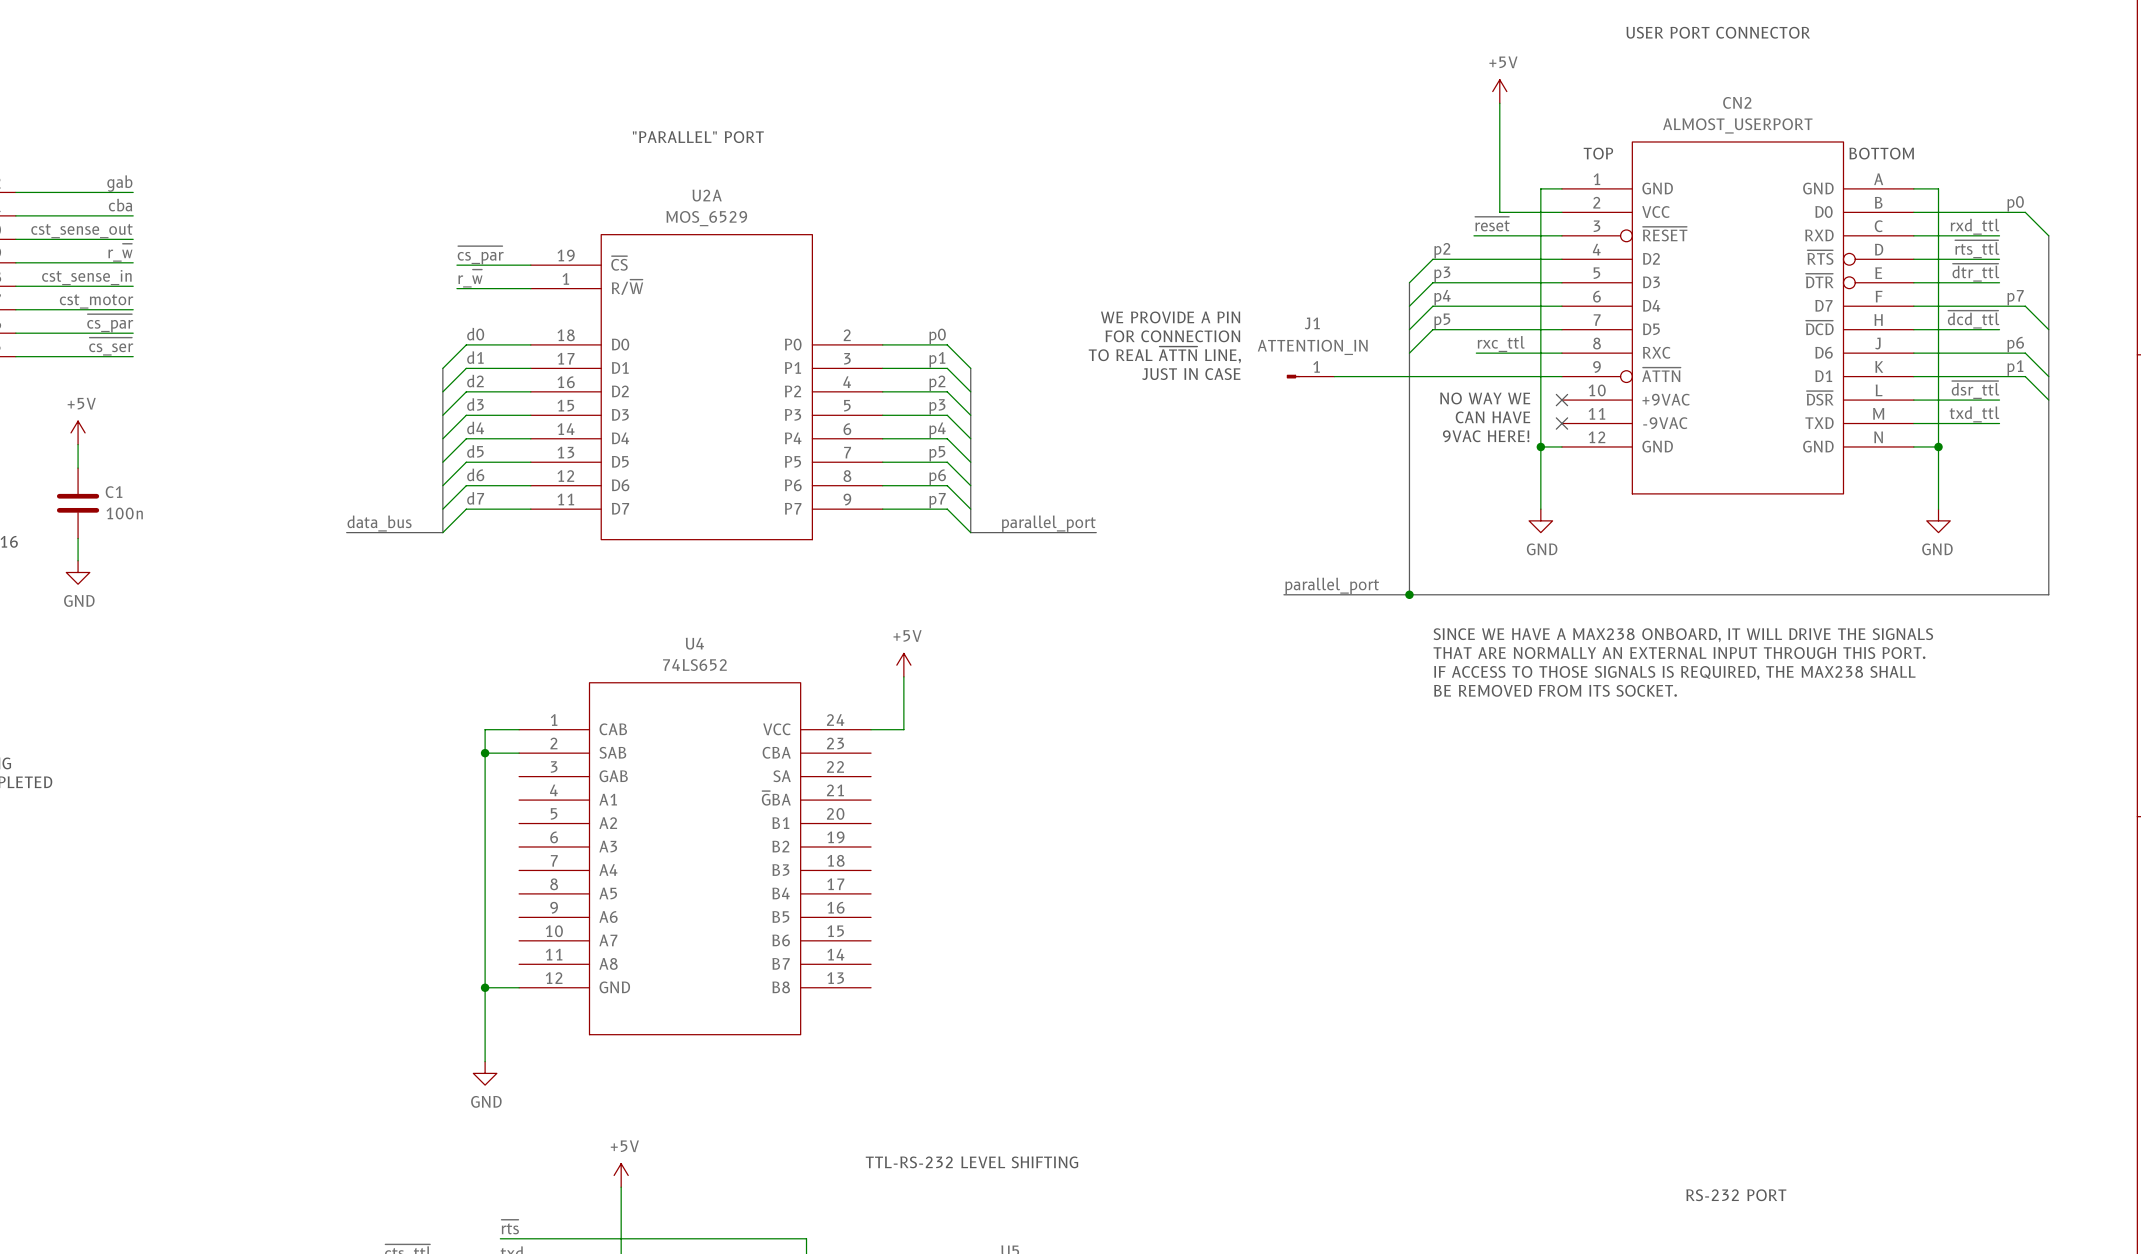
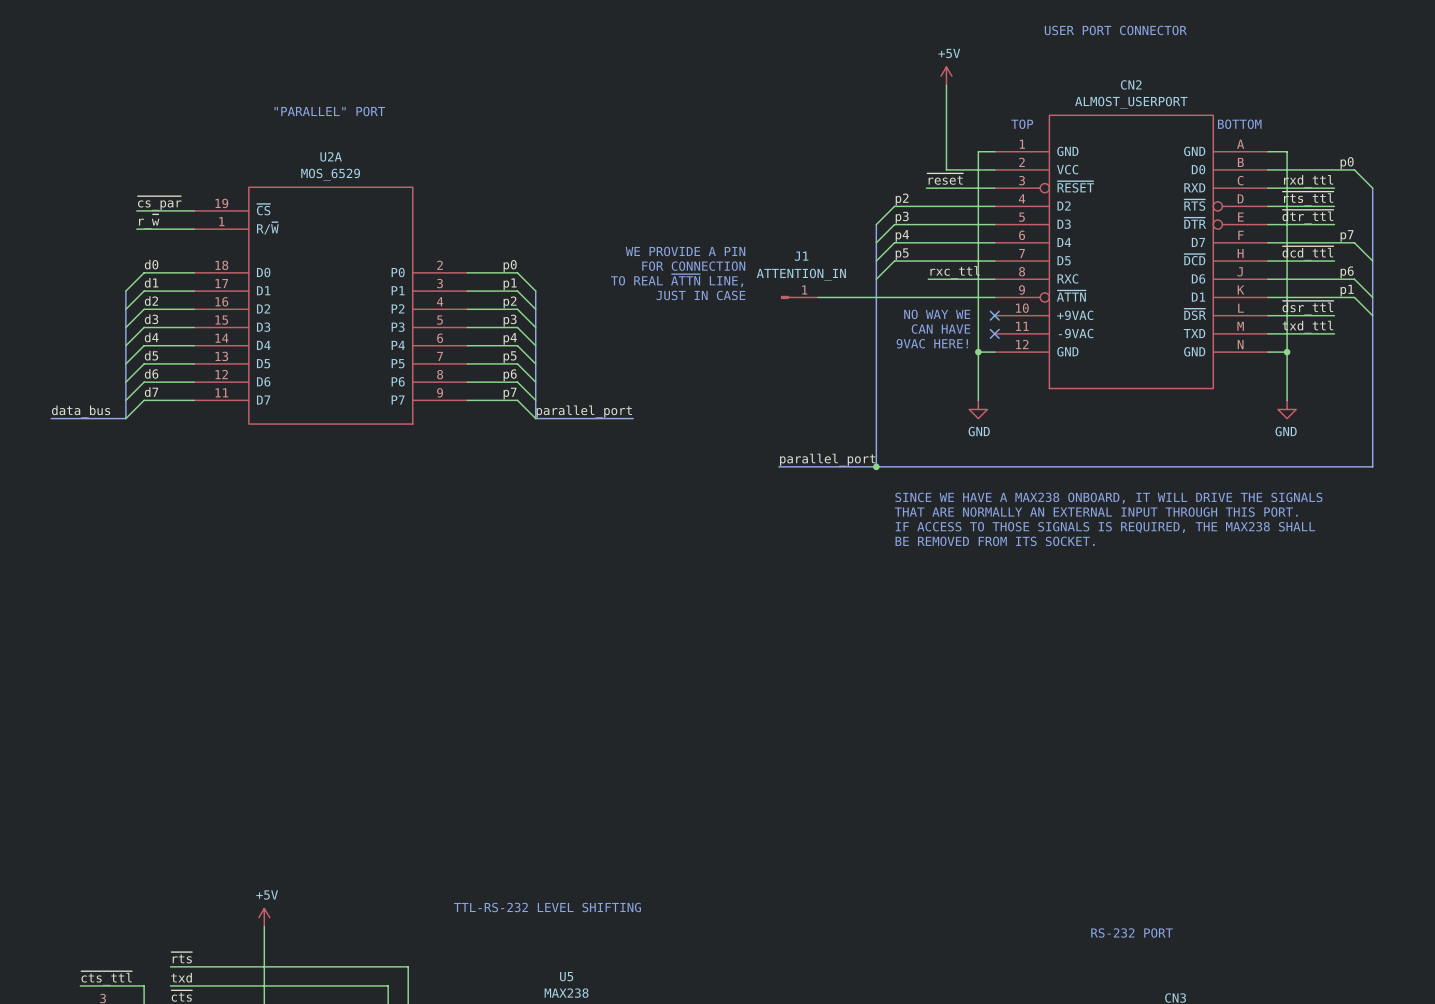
power symbol: +5V (903, 665) -> none
wire: (903, 676) (903, 729) (871, 729) -> none
wire: (519, 729) (485, 729) (485, 1061) -> none
wire: (485, 753) (519, 753) -> none
junction: (485, 753) -> none
U4: 74LS652 (695, 858) -> none
wire: (485, 987) (519, 987) -> none
junction: (485, 987) -> none
power symbol: GND (485, 1073) -> none

